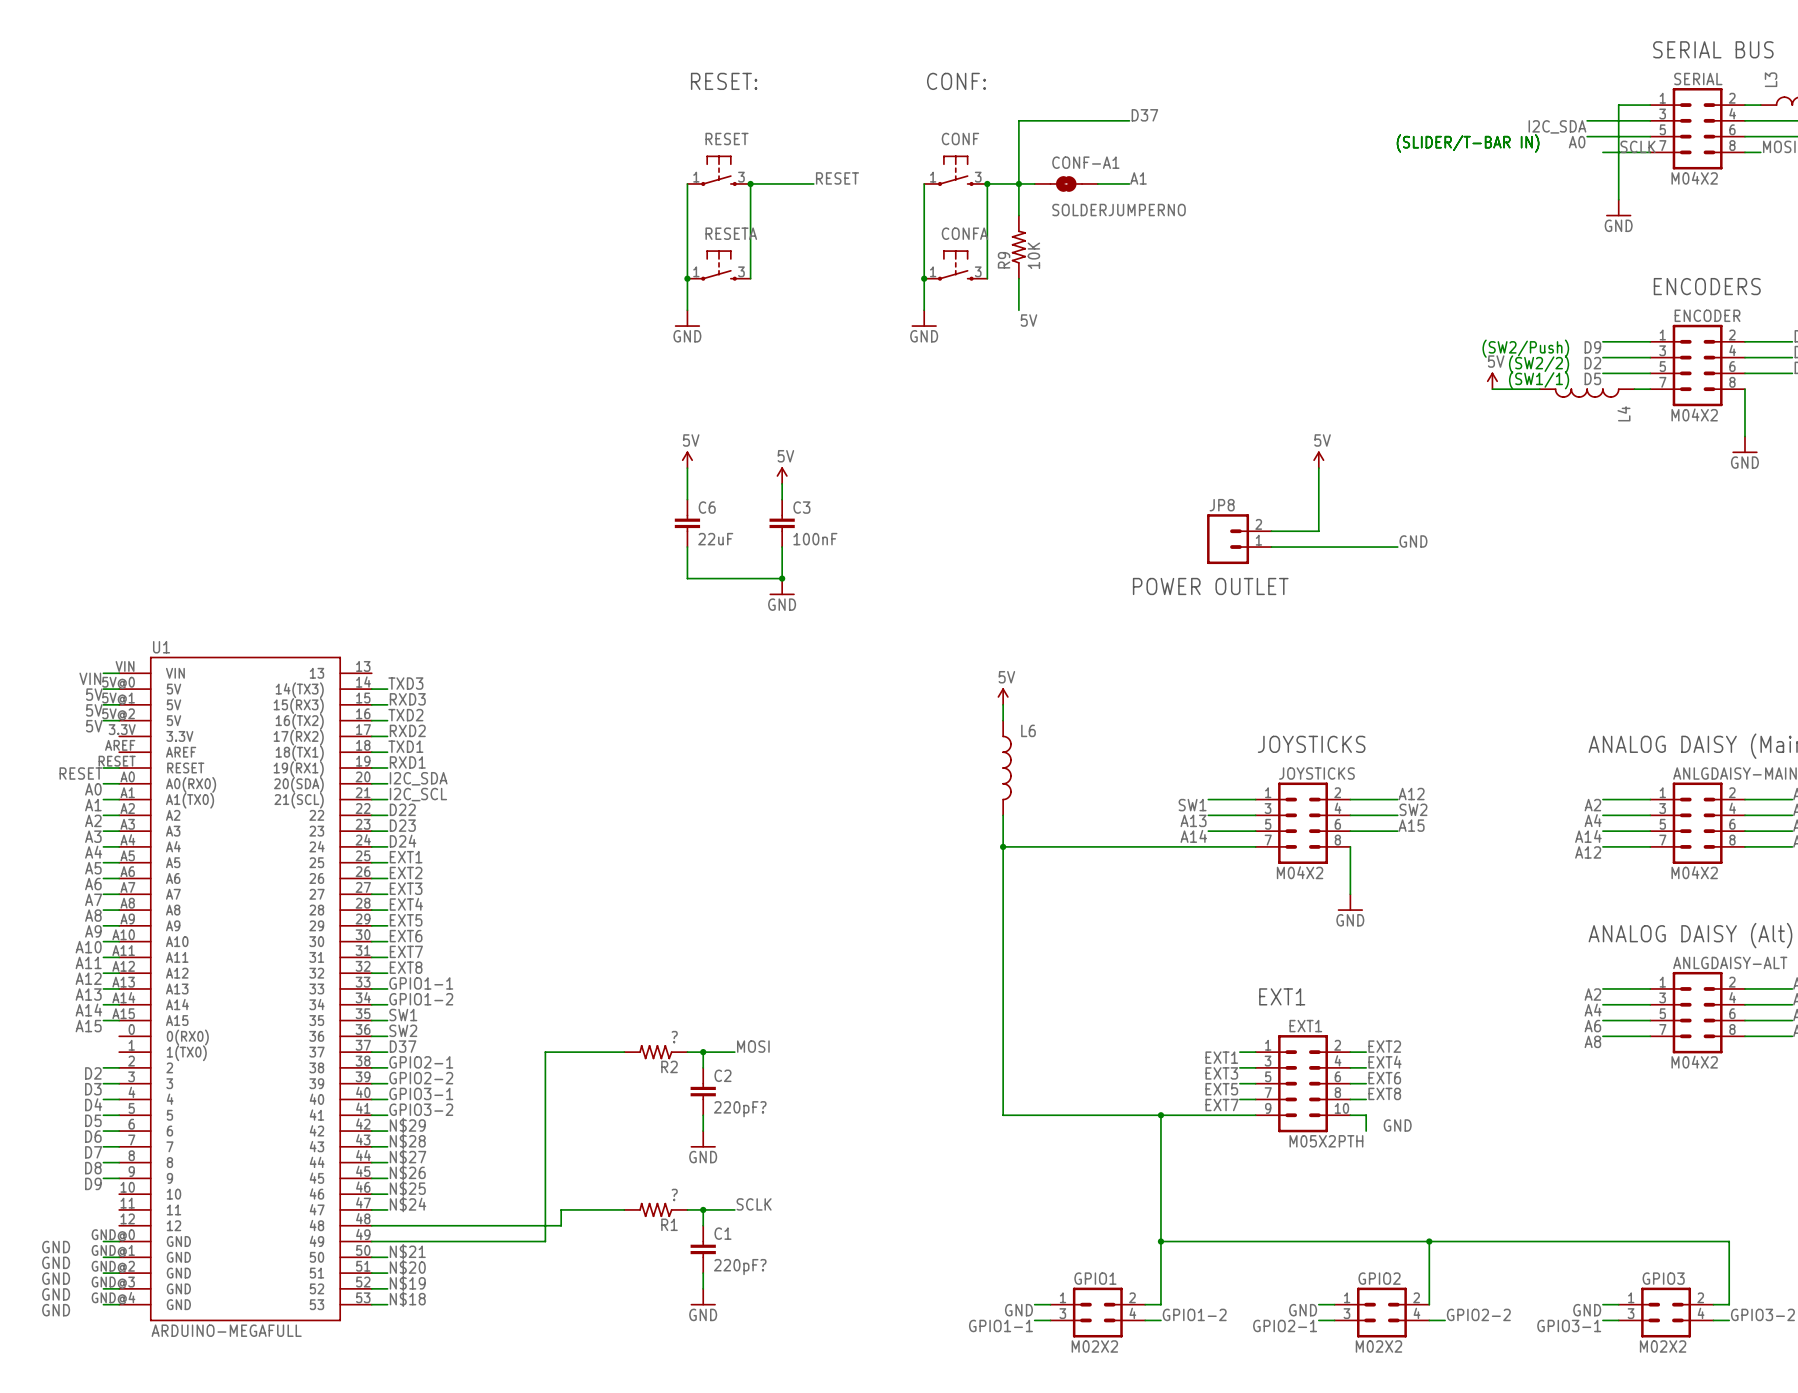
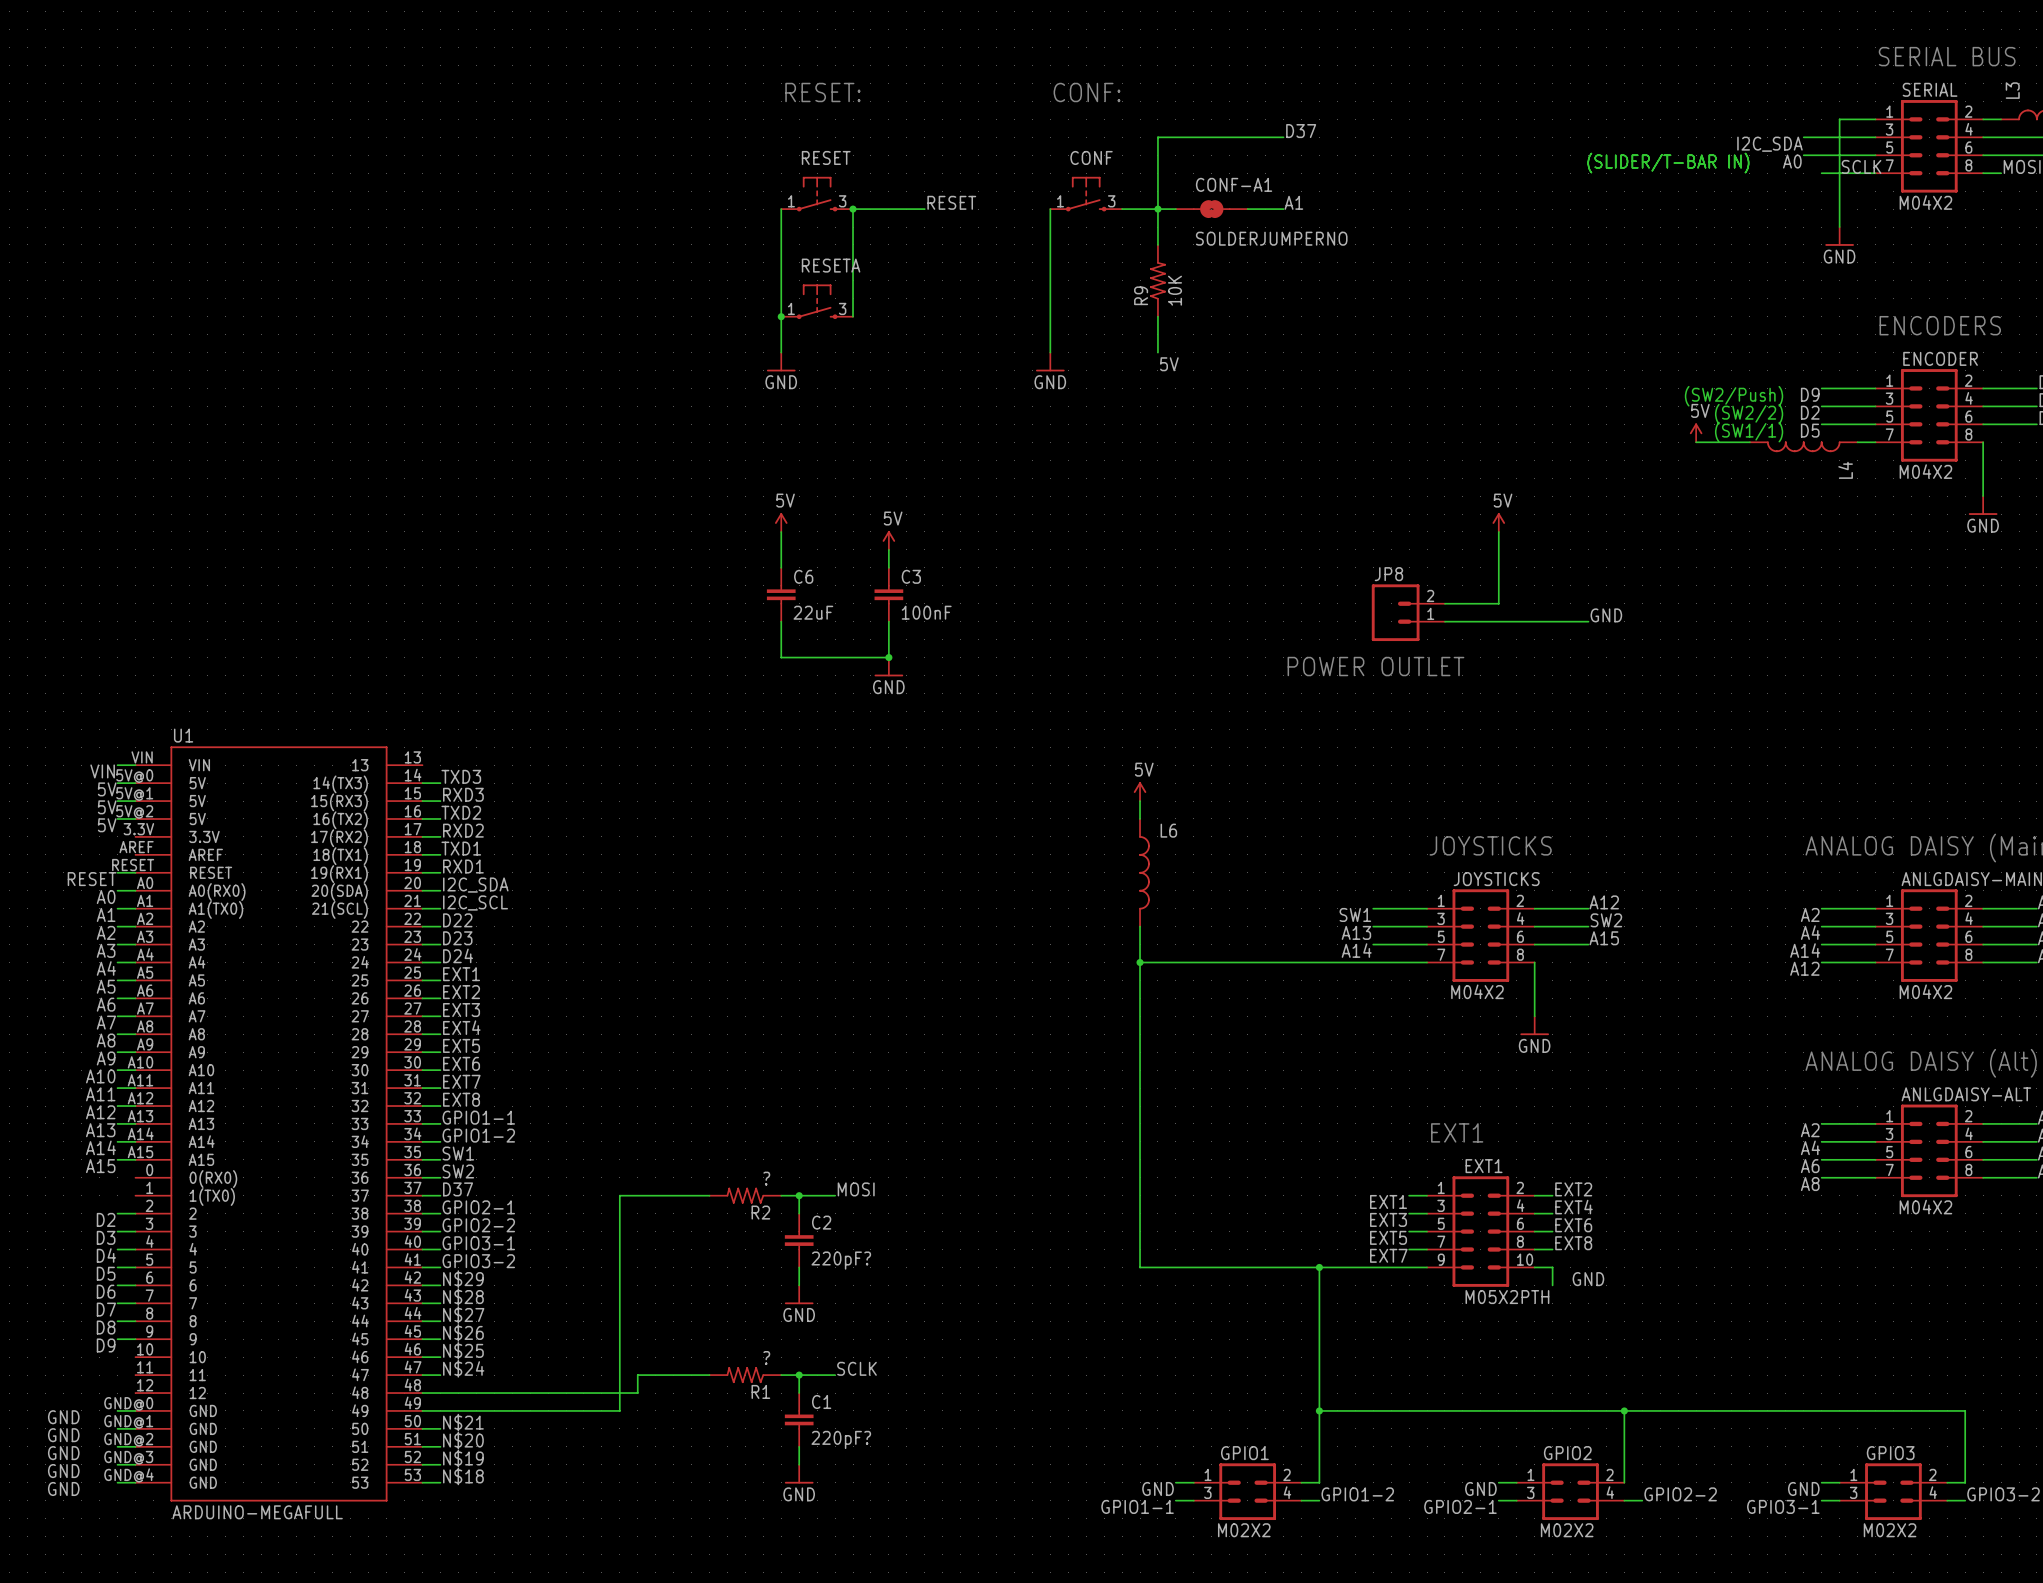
wire: (987, 183) (987, 278) -> none
junction: (987, 183) -> none
CONFA: (955, 265) -> none
junction: (924, 278) -> none

